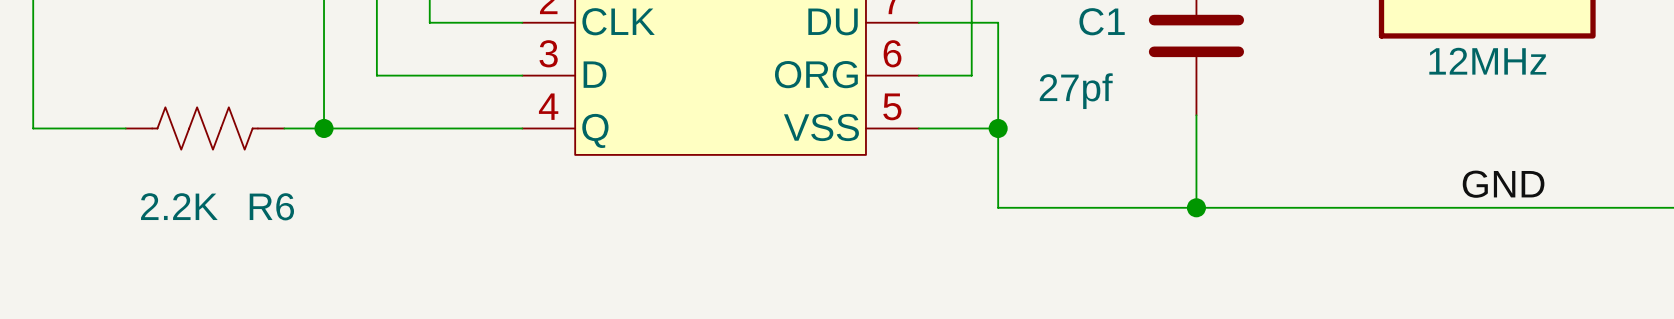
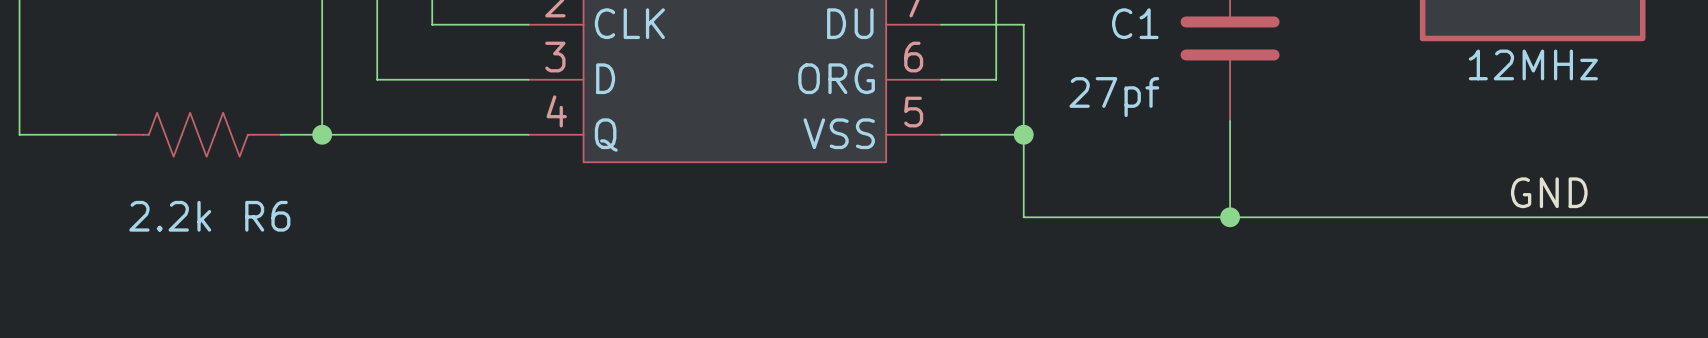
R6 value: 2.2K (179, 206) -> 2.2k (170, 216)

